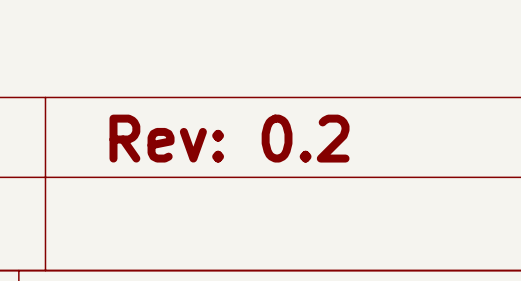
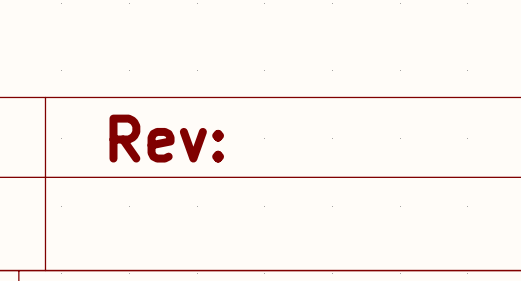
title block: Rev: 0.2 (229, 138) -> Rev: (166, 138)

